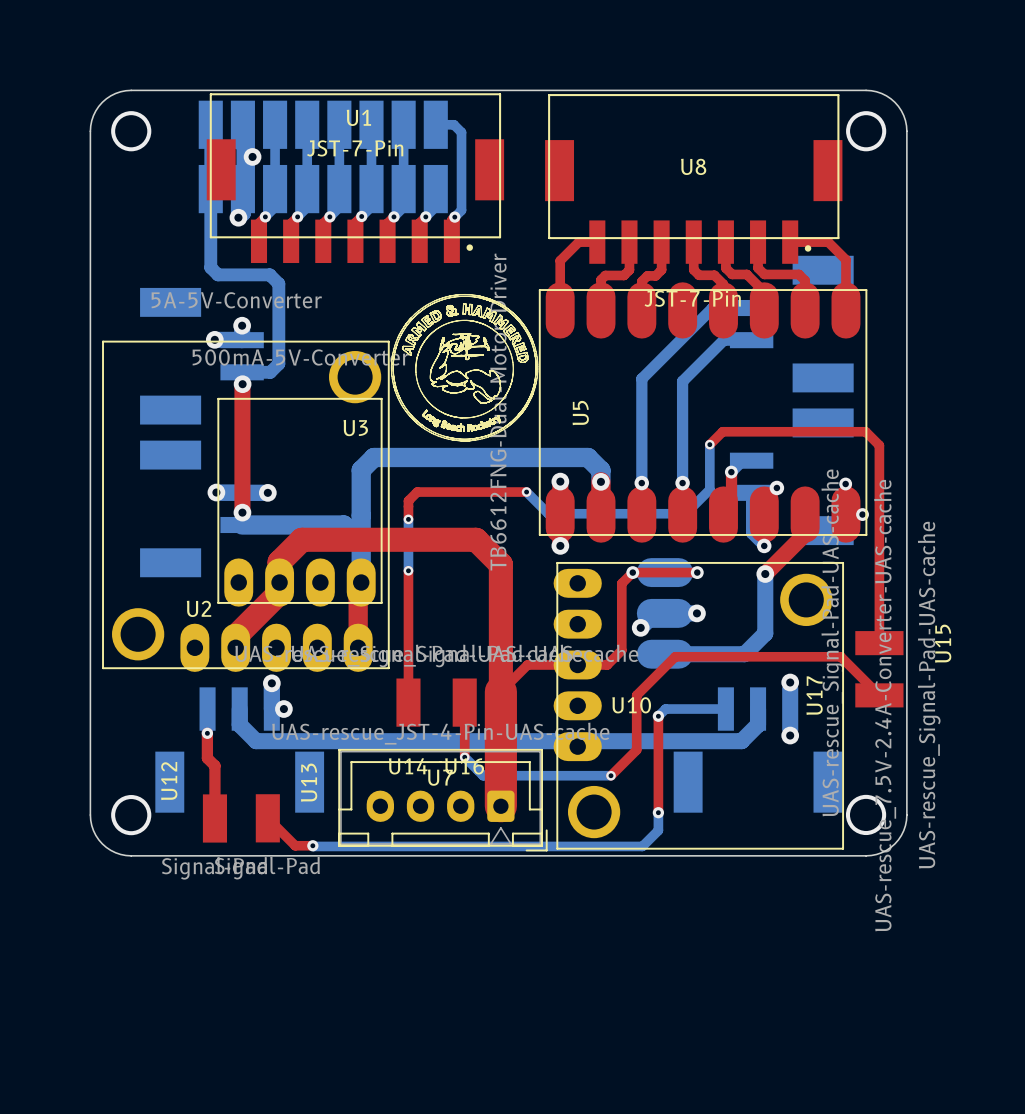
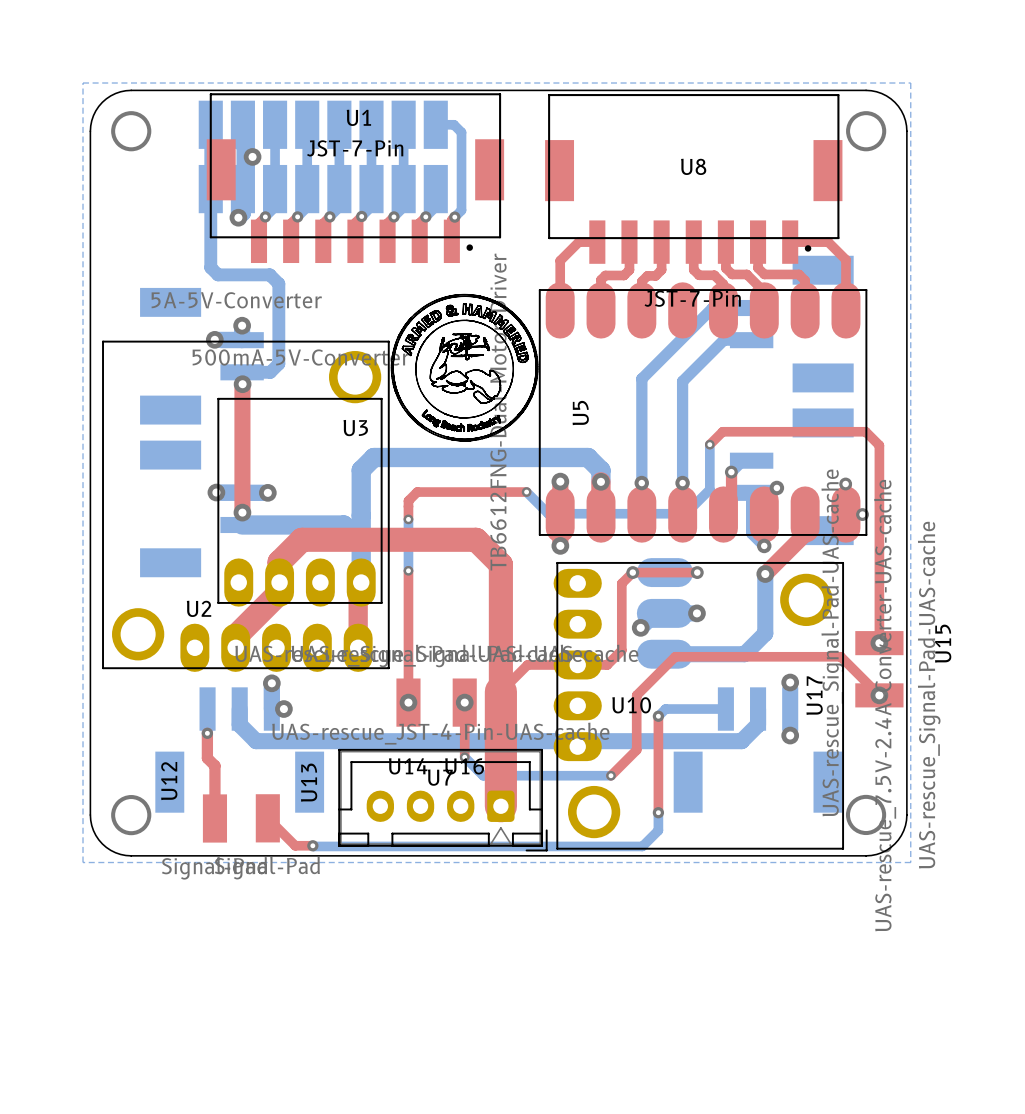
bottom zone outline: none -> (83, 83) (83, 862) (910, 862) (910, 83) (83, 83)
via: none -> (879, 643)
via: none -> (879, 695)
via: none -> (408, 702)
via: none -> (464, 702)

